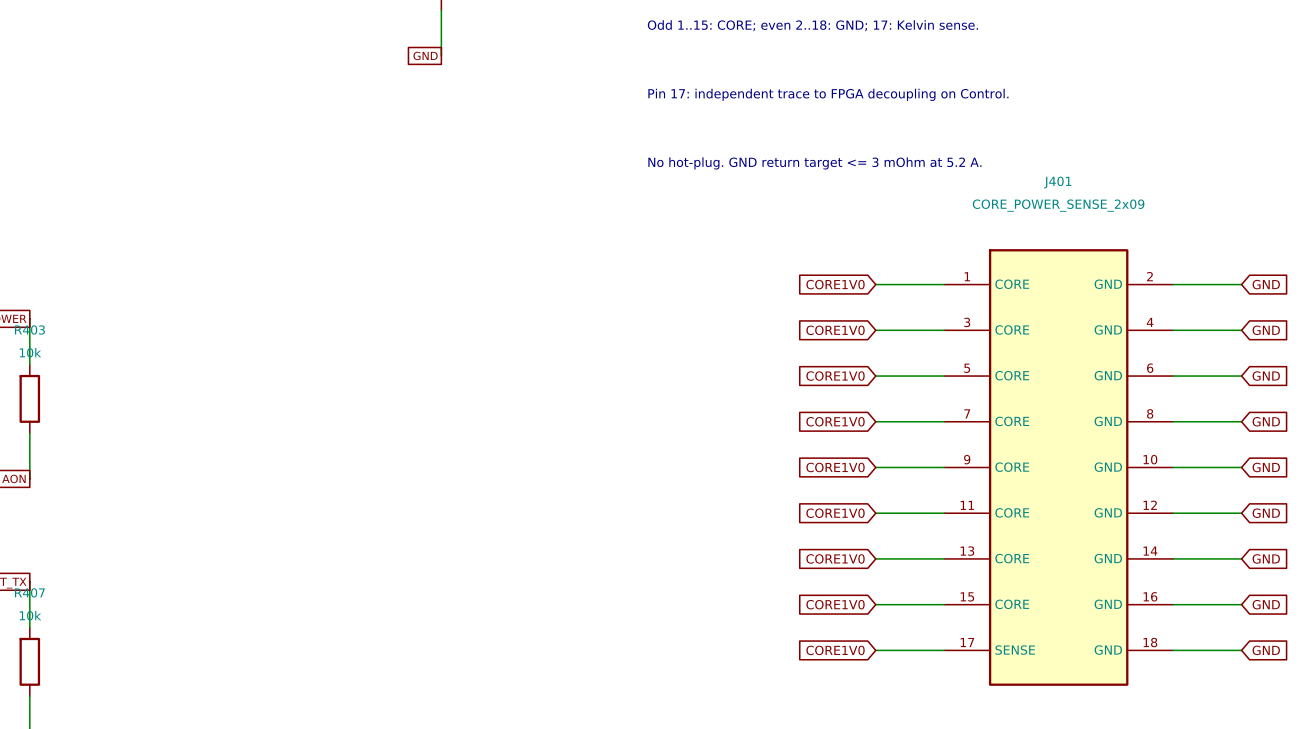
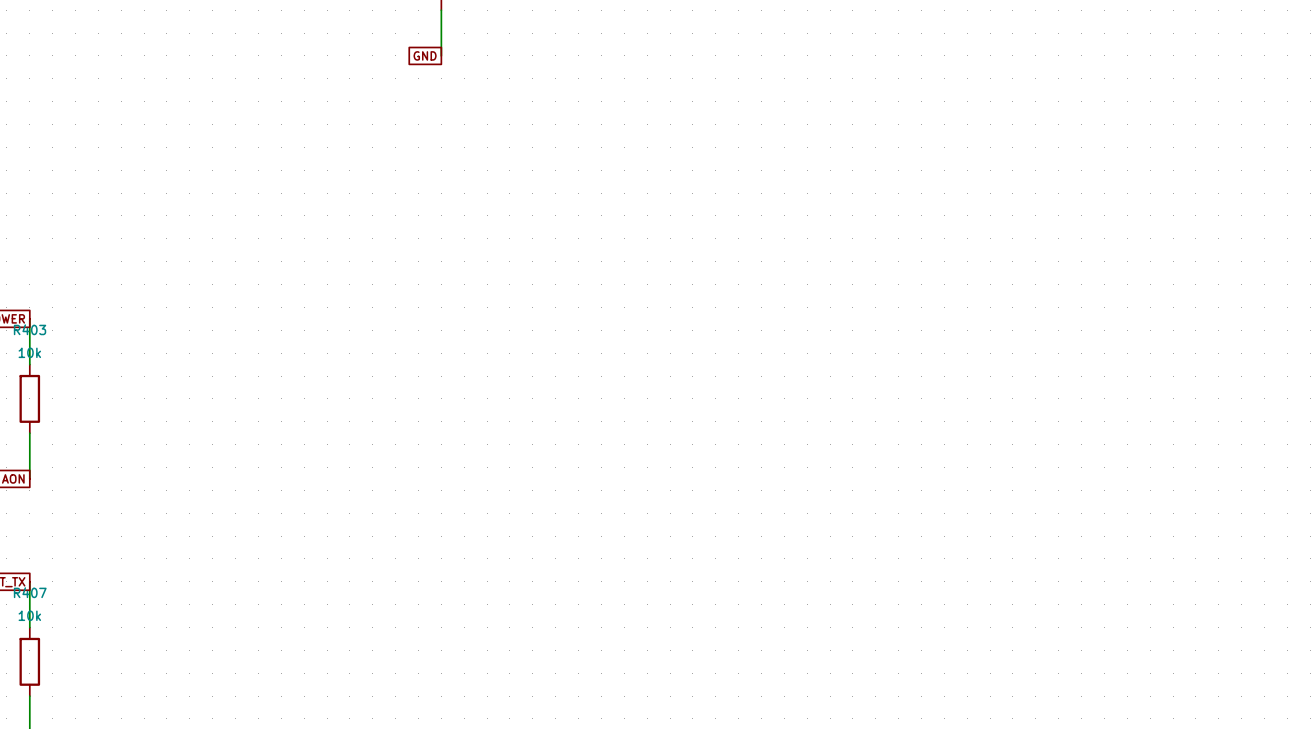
text: Odd 1..15: CORE; even 2..18: GND; 17: Kelvin sense. (812, 25) -> none
text: Pin 17: independent trace to FPGA decoupling on Control. (828, 94) -> none
text: No hot-plug. GND return target <= 3 mOhm at 5.2 A. (814, 163) -> none
global label: CORE1V0 (835, 284) -> none
wire: (875, 284) (944, 284) -> none
wire: (1173, 284) (1241, 284) -> none
global label: GND (1266, 284) -> none
global label: CORE1V0 (835, 330) -> none
wire: (875, 330) (944, 330) -> none
wire: (1173, 330) (1241, 330) -> none
global label: GND (1266, 330) -> none
global label: CORE1V0 (835, 376) -> none
wire: (875, 376) (944, 376) -> none
wire: (1173, 376) (1241, 376) -> none
global label: GND (1266, 376) -> none
global label: CORE1V0 (835, 421) -> none
wire: (875, 421) (944, 421) -> none
wire: (1173, 421) (1241, 421) -> none
global label: GND (1266, 421) -> none
global label: CORE1V0 (835, 467) -> none
wire: (875, 467) (944, 467) -> none
J401: CORE_POWER_SENSE_2x09 (1058, 467) -> none
wire: (1173, 467) (1241, 467) -> none
global label: GND (1266, 467) -> none
global label: CORE1V0 (835, 513) -> none
wire: (875, 513) (944, 513) -> none
wire: (1173, 513) (1241, 513) -> none
global label: GND (1266, 513) -> none
global label: CORE1V0 (835, 558) -> none
wire: (875, 558) (944, 558) -> none
wire: (1173, 558) (1241, 558) -> none
global label: GND (1266, 558) -> none
global label: CORE1V0 (835, 604) -> none
wire: (875, 604) (944, 604) -> none
wire: (1173, 604) (1241, 604) -> none
global label: GND (1266, 604) -> none
global label: CORE1V0 (835, 650) -> none
wire: (875, 650) (944, 650) -> none
wire: (1173, 650) (1241, 650) -> none
global label: GND (1266, 650) -> none

